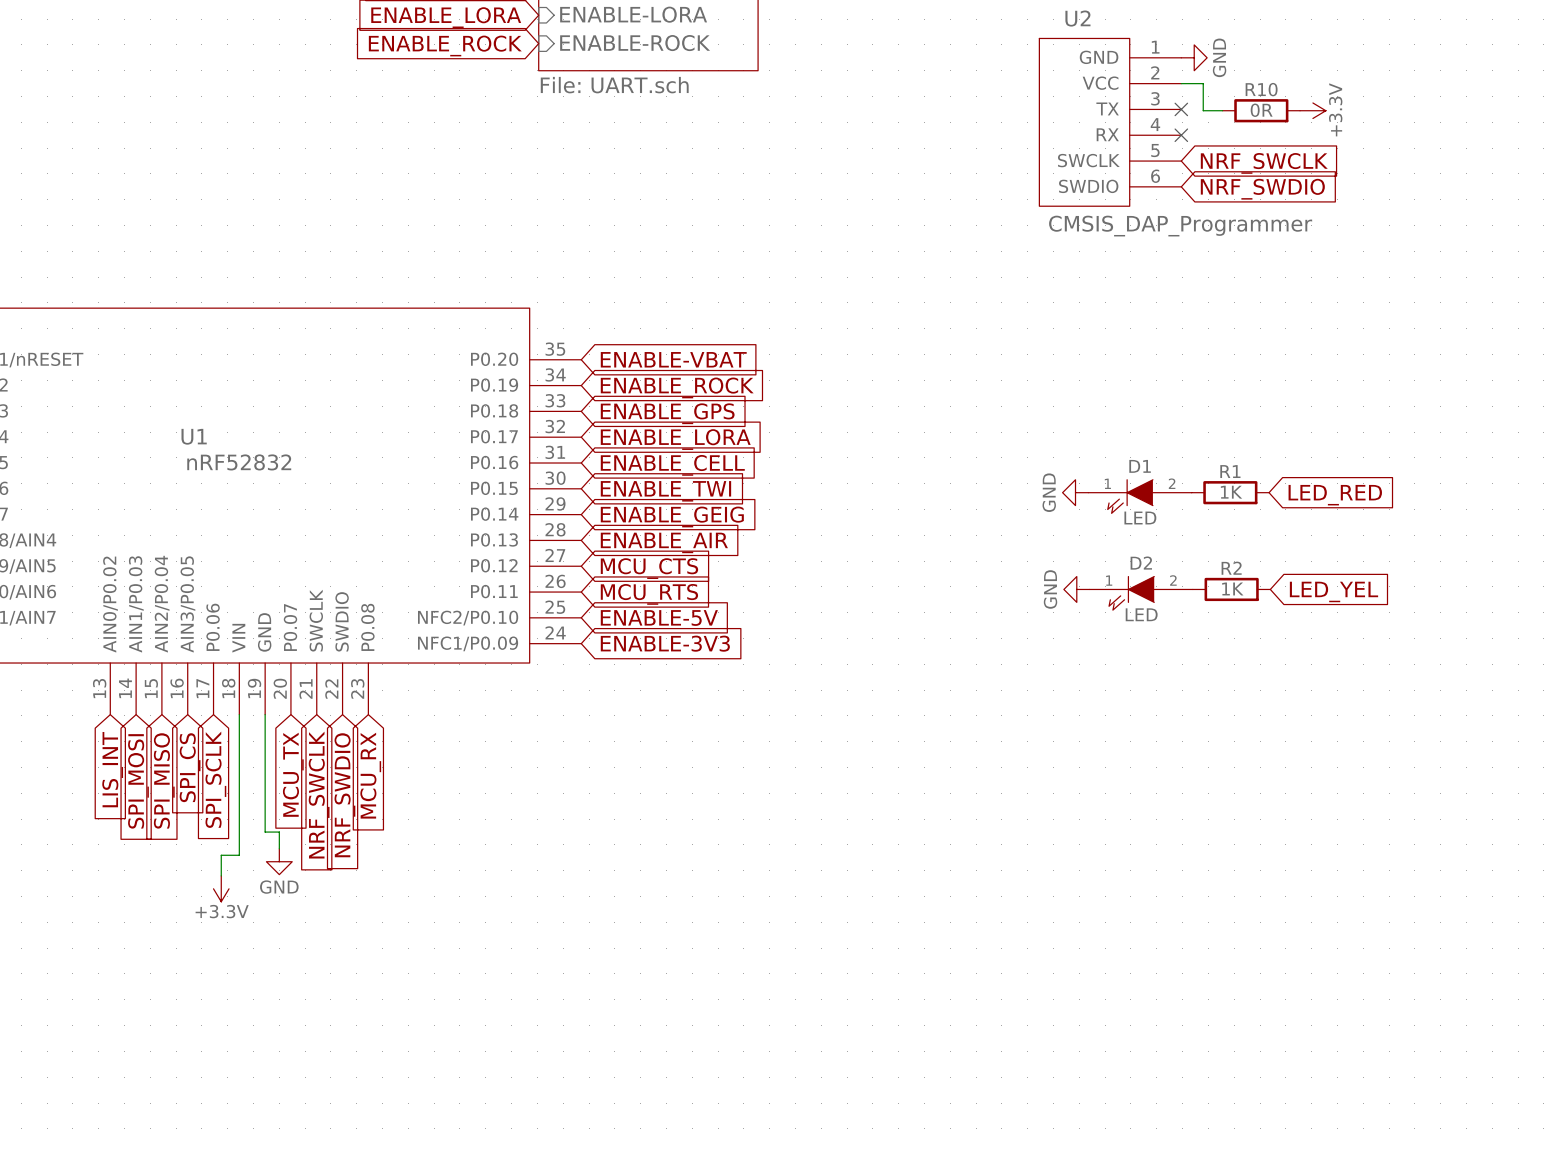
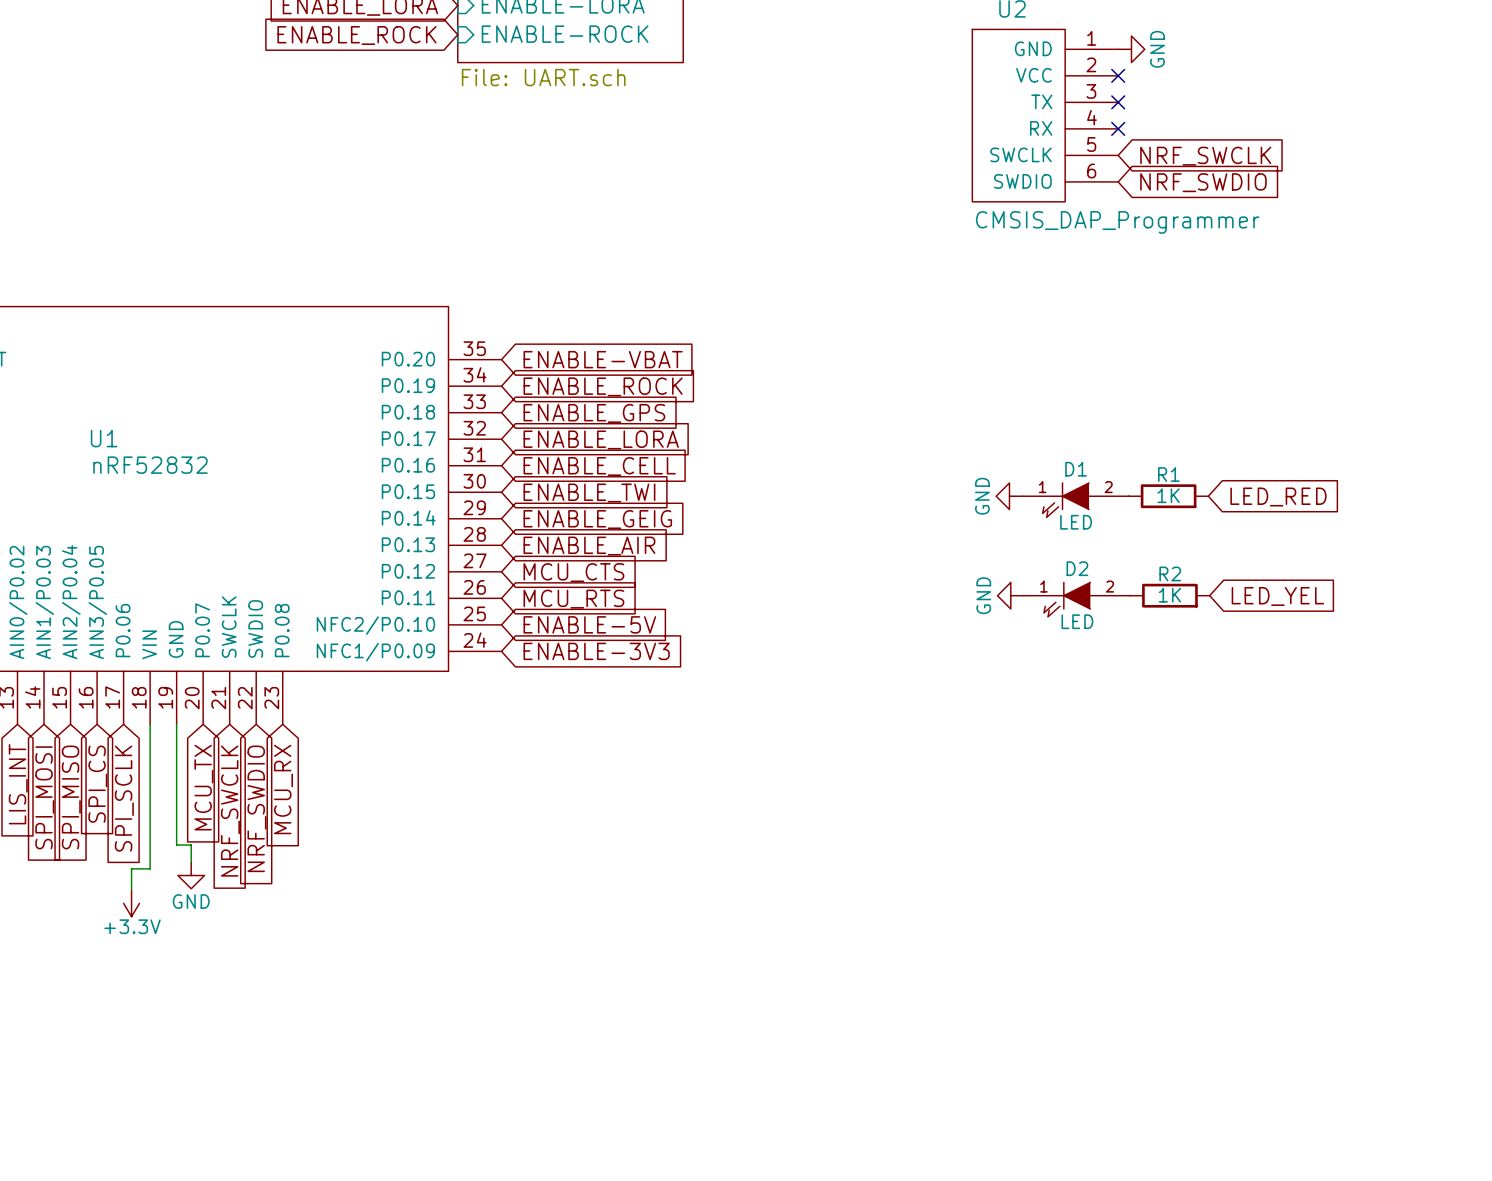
wire: (1181, 83) (1203, 83) (1203, 110) (1222, 110) -> none
no-connect mark: none -> (1118, 75)
R10: 0R (1261, 110) -> none
power symbol: +3.3V (1312, 110) -> none

